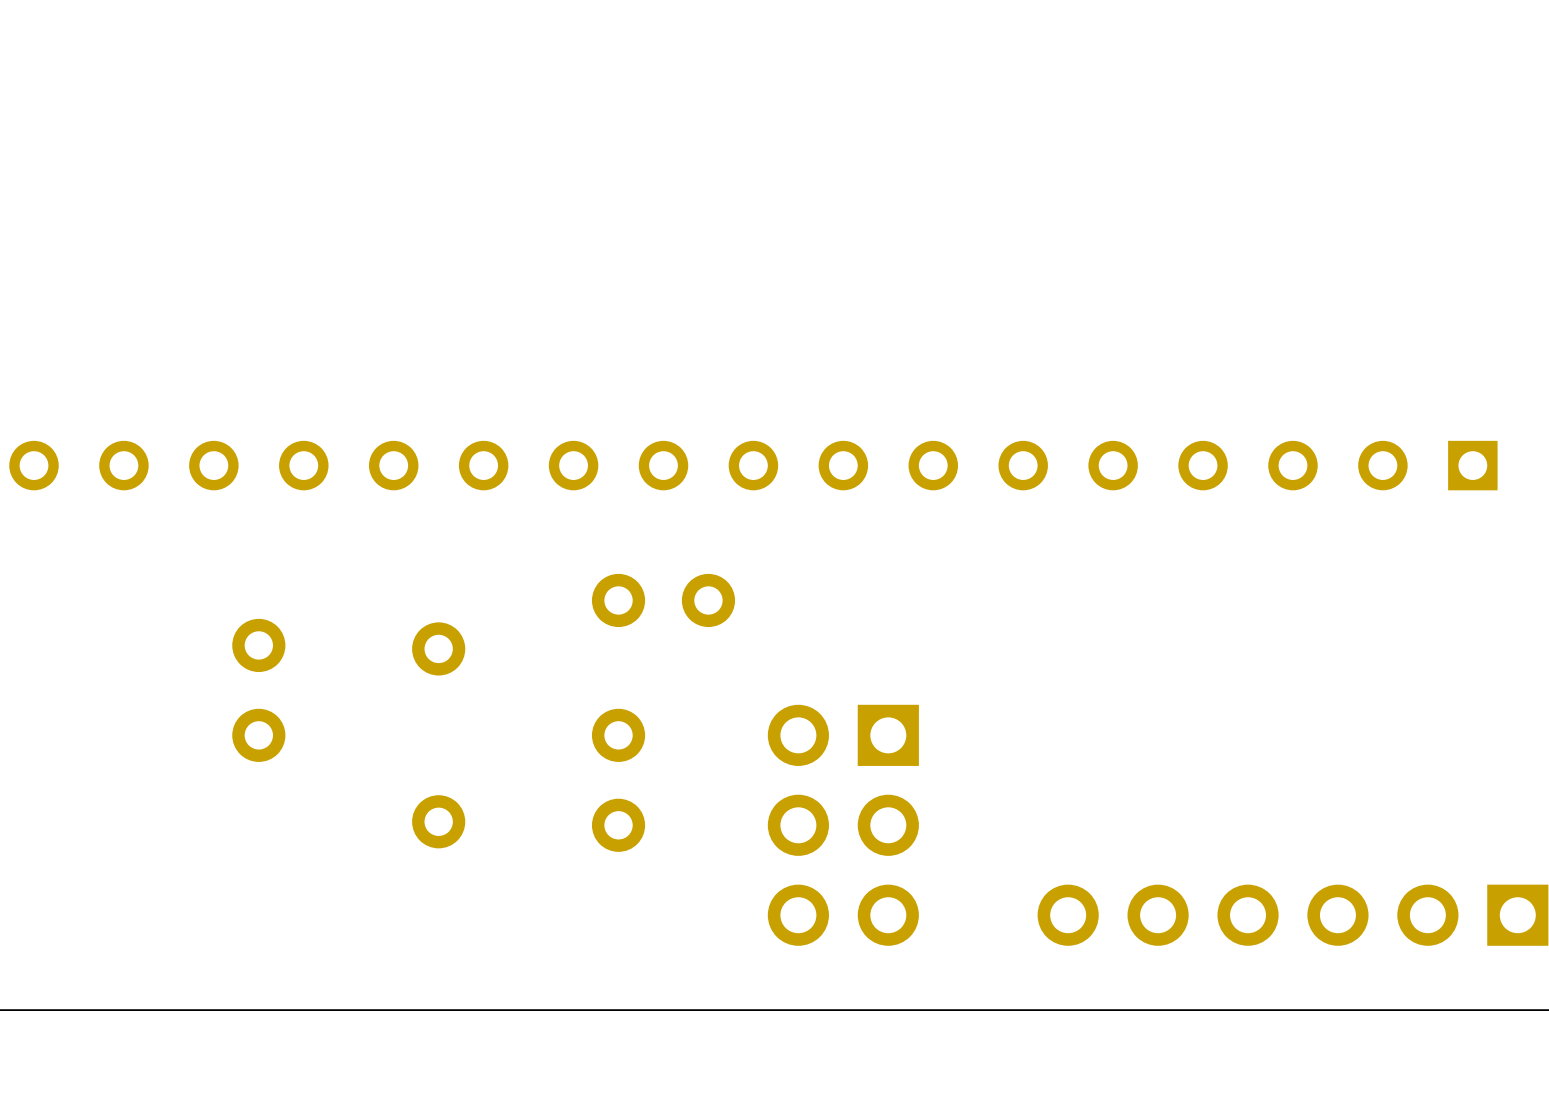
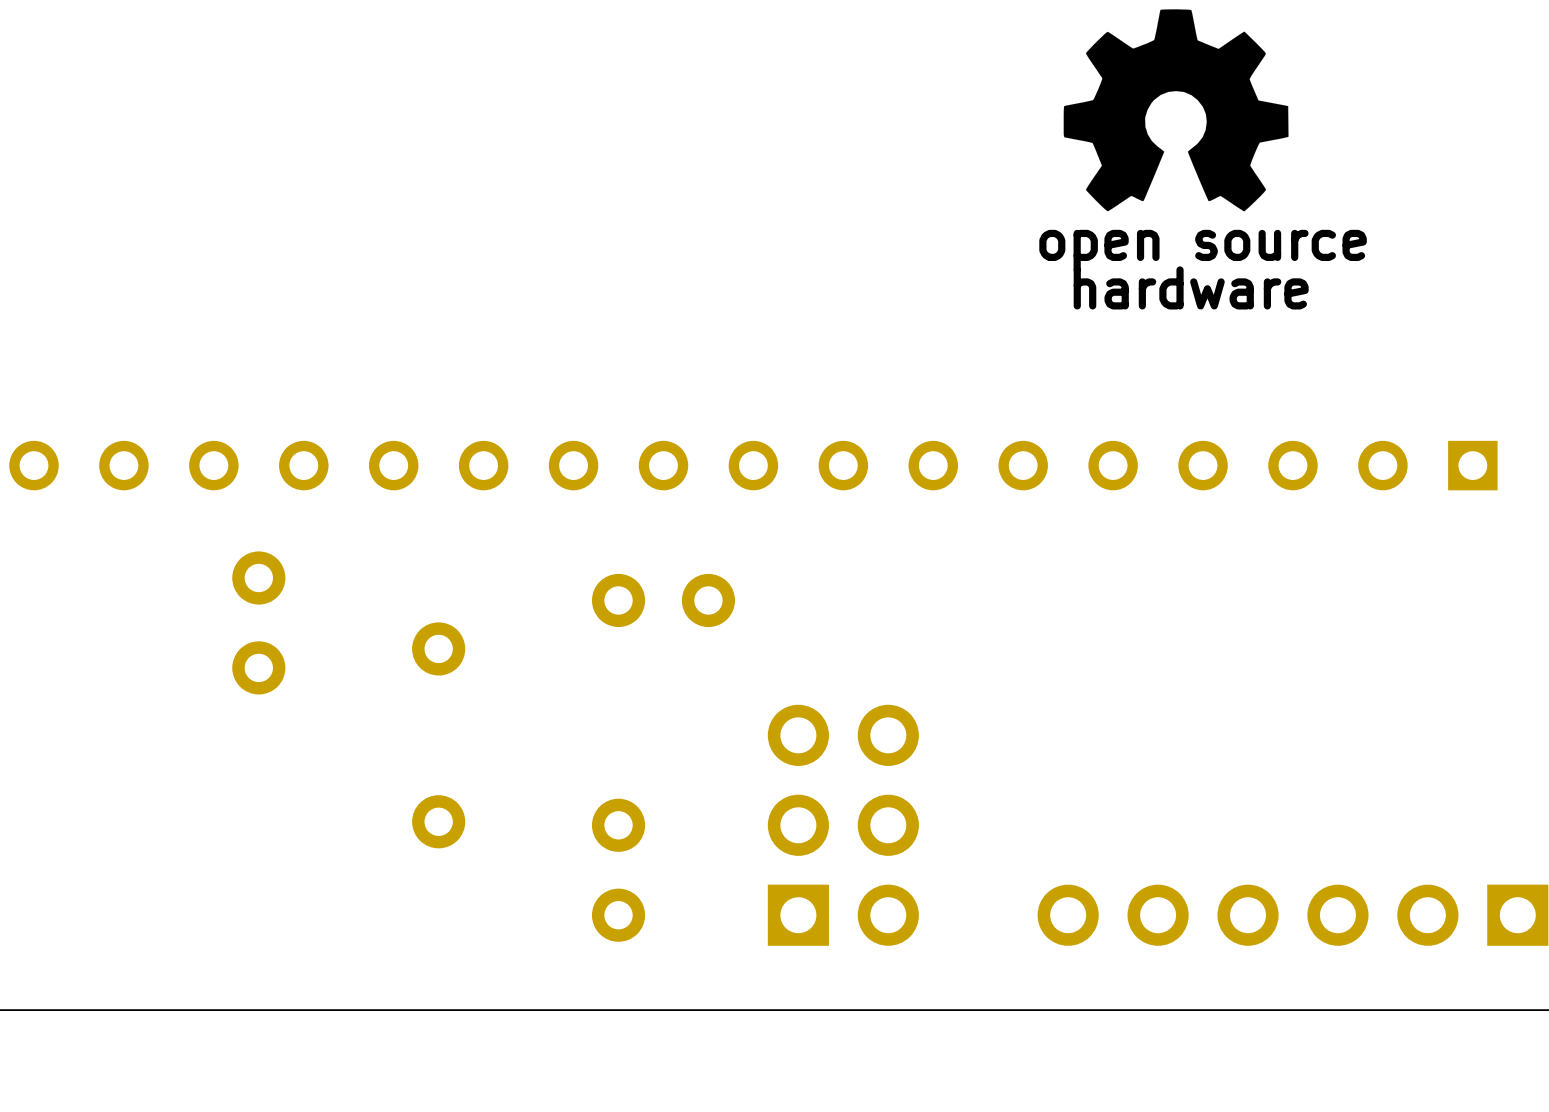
drawing: none -> [1063, 9, 1289, 212]
text: none -> open source (1203, 251)
text: none -> hardware (1191, 287)
part position: (258, 690) -> (258, 622)
part position: (618, 780) -> (618, 870)
part rotation: 0° (843, 825) -> 180° (843, 825)

